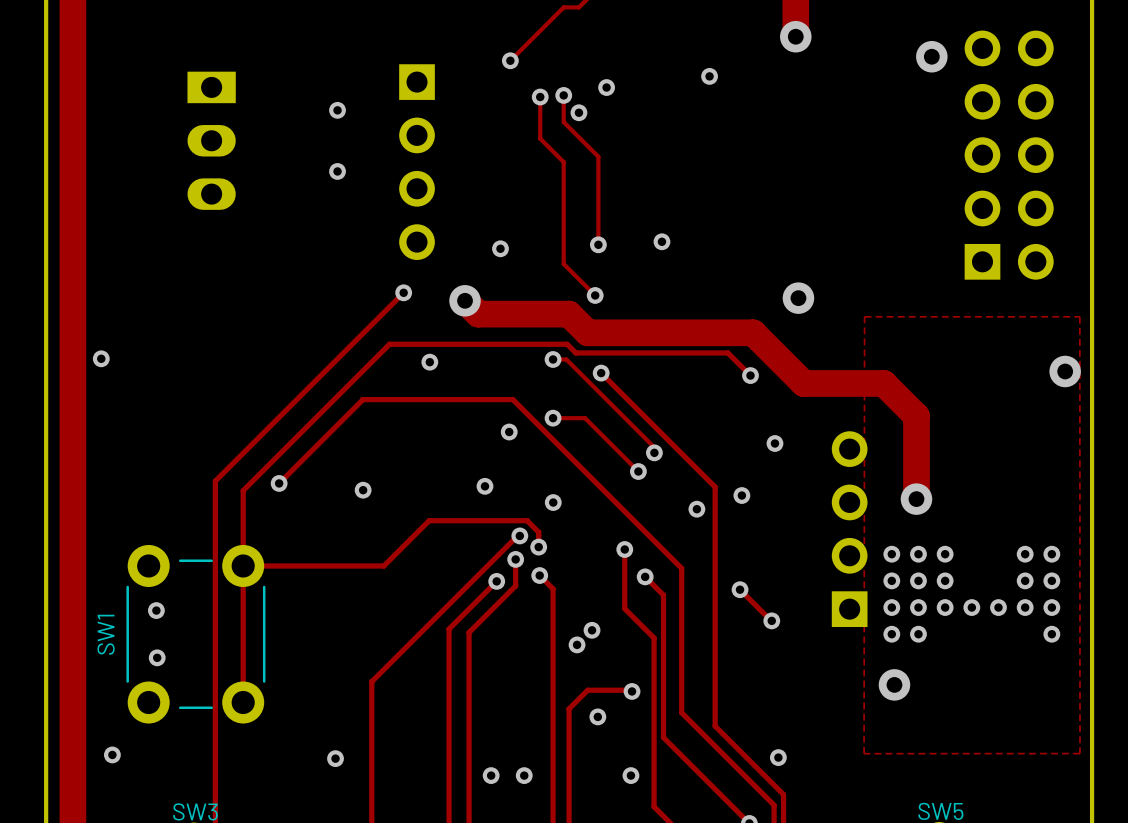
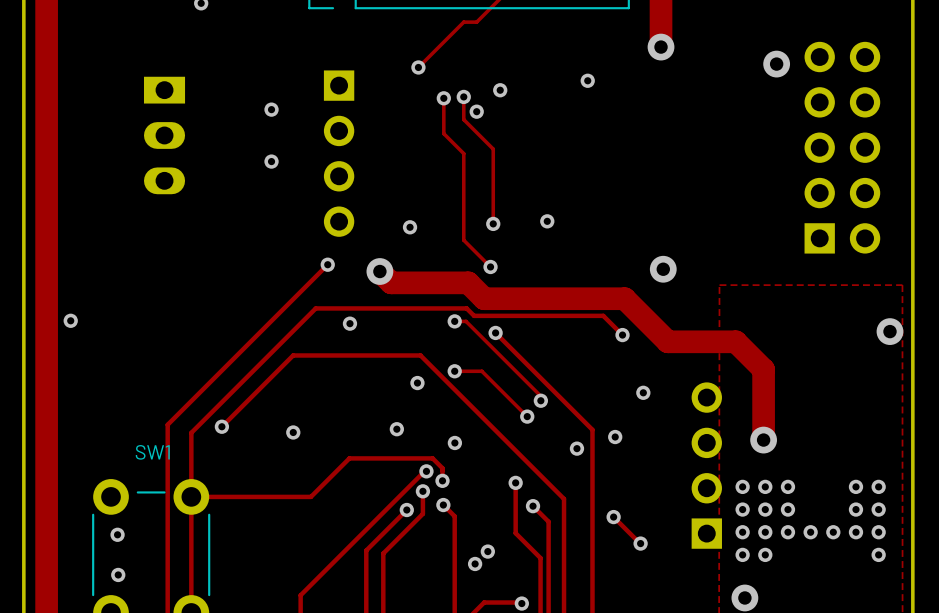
SW1 name rotation: 0° (106, 634) -> 90° clockwise (152, 452)
SW1 name position: SW1 (106, 634) -> SW1 (152, 452)

